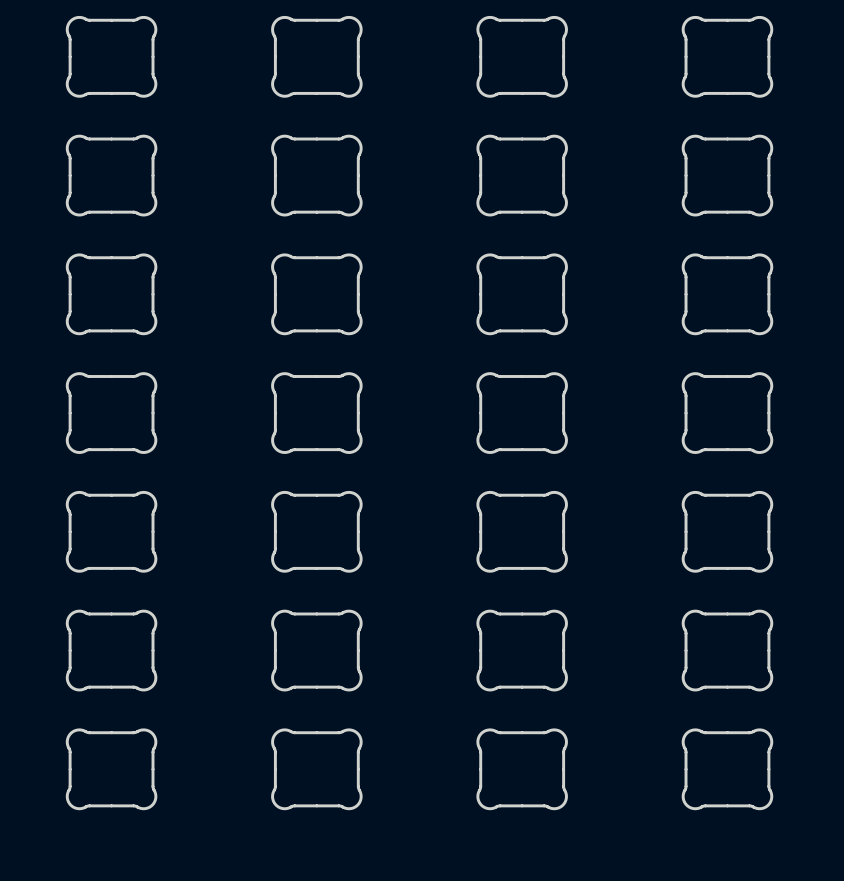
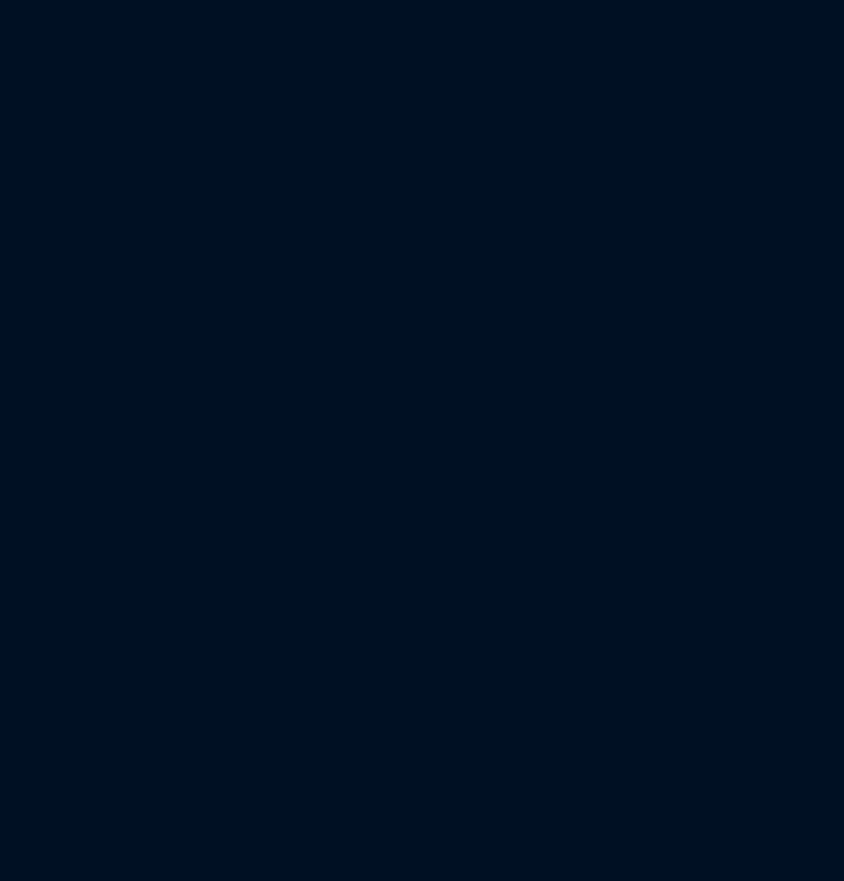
part: (111, 56) -> none
part: (316, 56) -> none
part: (522, 56) -> none
part: (727, 56) -> none
part: (111, 175) -> none
part: (316, 175) -> none
part: (522, 175) -> none
part: (727, 175) -> none
part: (111, 294) -> none
part: (316, 294) -> none
part: (522, 294) -> none
part: (727, 294) -> none
part: (111, 413) -> none
part: (316, 413) -> none
part: (522, 413) -> none
part: (727, 413) -> none
part: (111, 531) -> none
part: (316, 531) -> none
part: (522, 531) -> none
part: (727, 531) -> none
part: (111, 650) -> none
part: (316, 650) -> none
part: (522, 650) -> none
part: (727, 650) -> none
part: (111, 769) -> none
part: (316, 769) -> none
part: (522, 769) -> none
part: (727, 769) -> none

